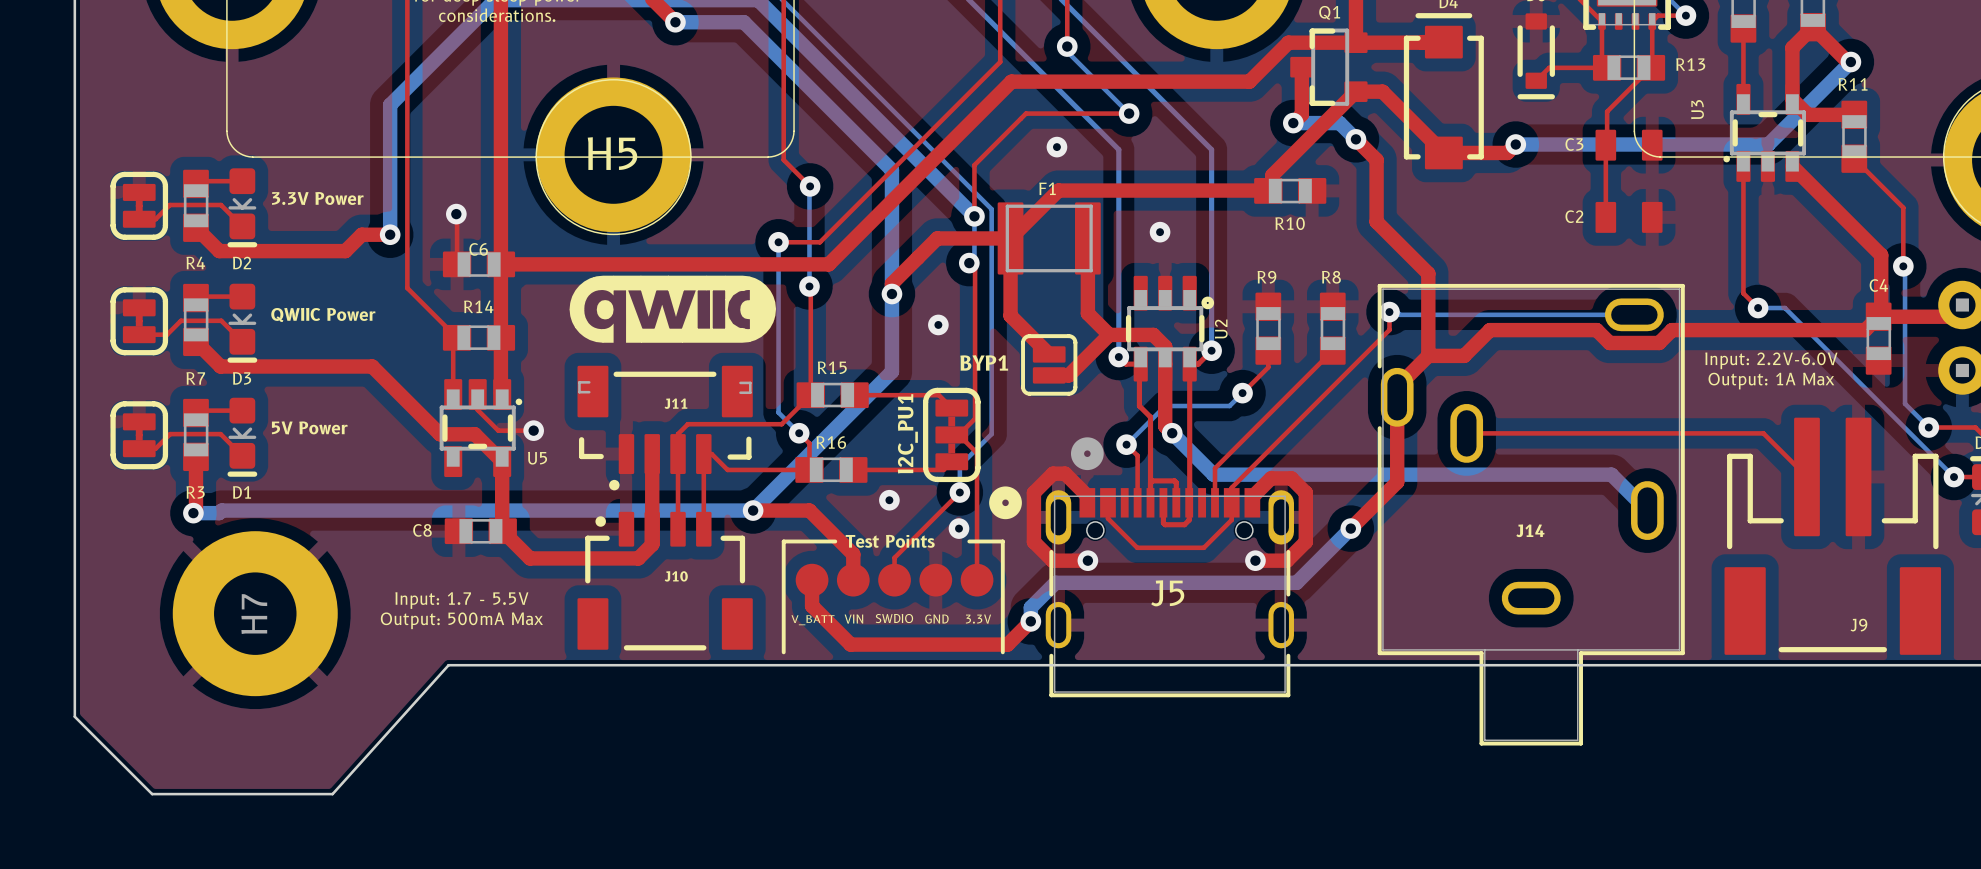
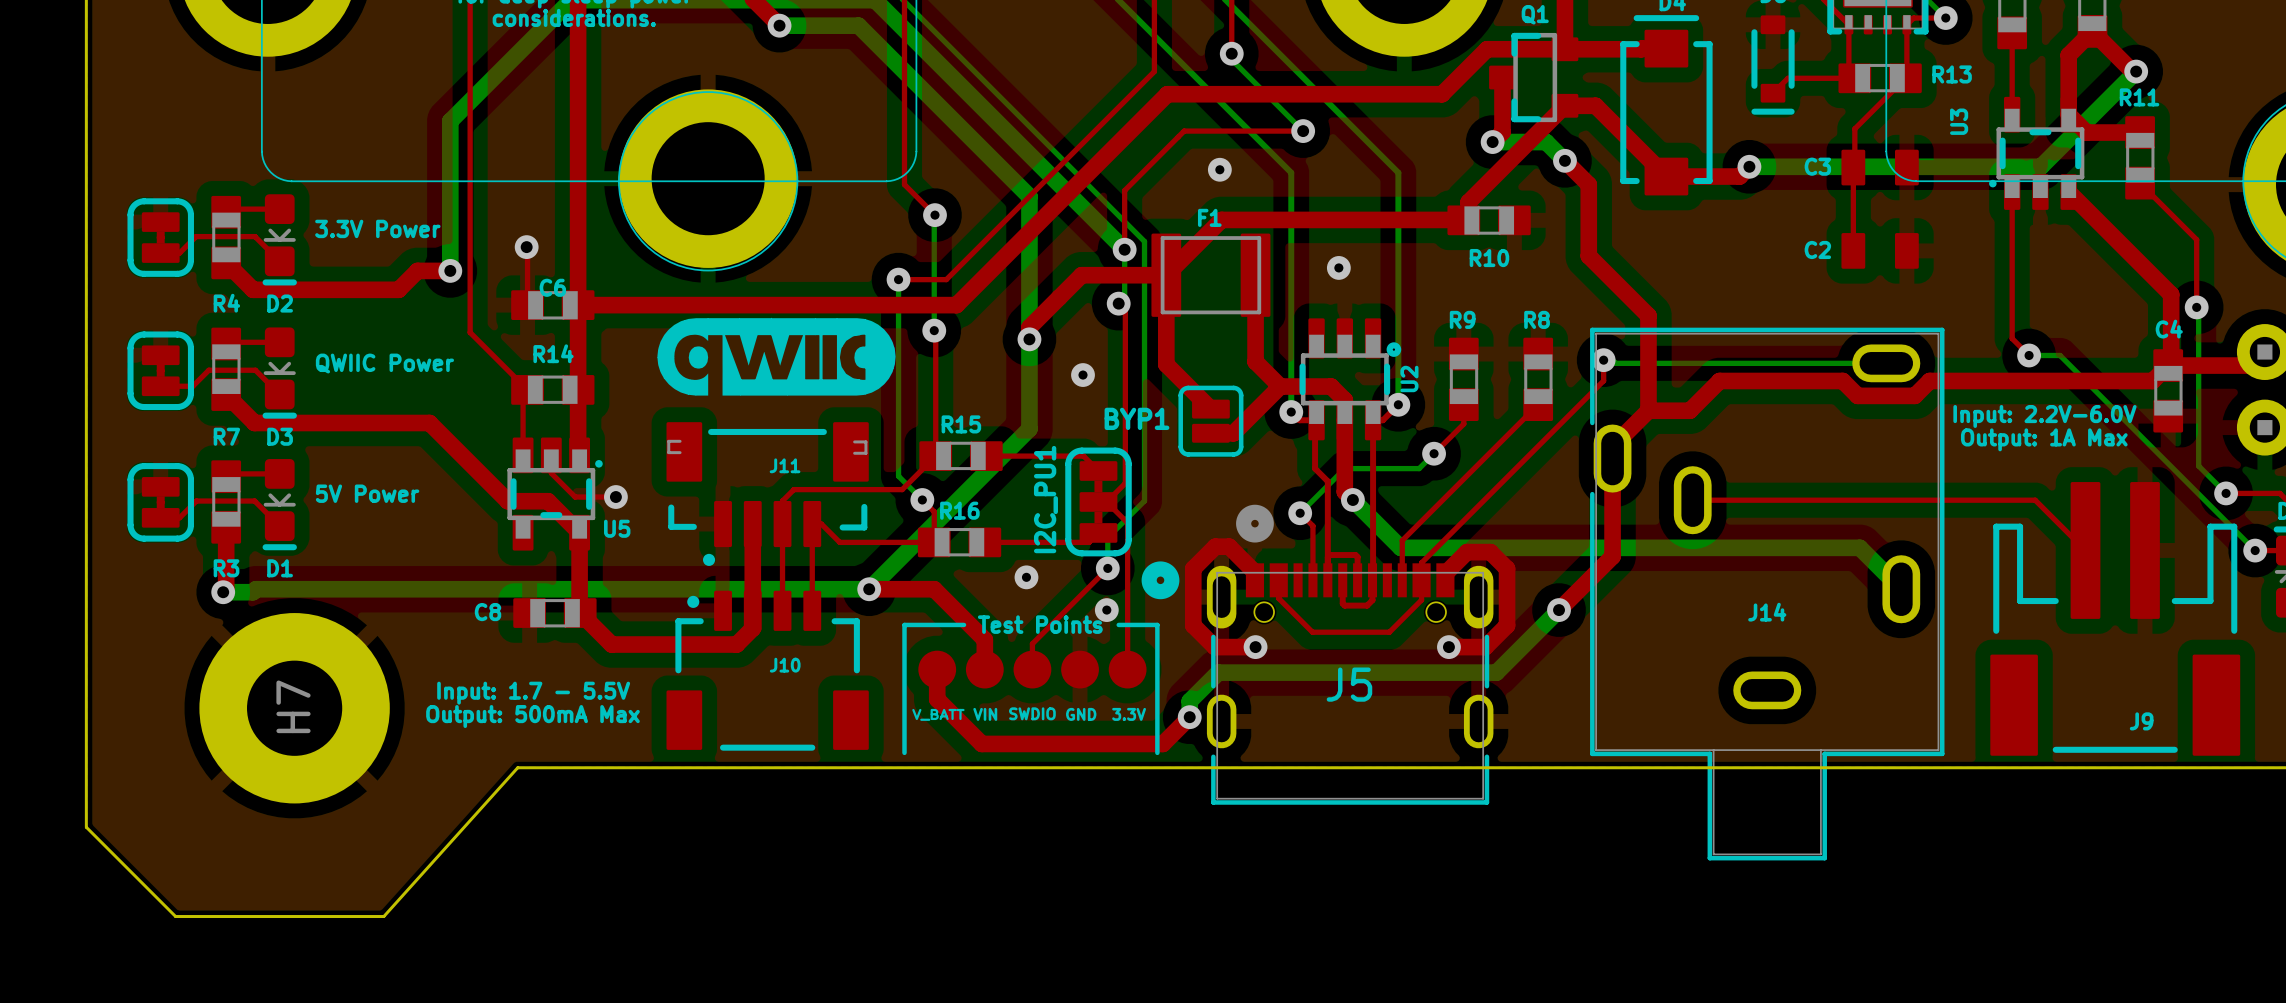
H5 name: H5 (612, 153) -> none

